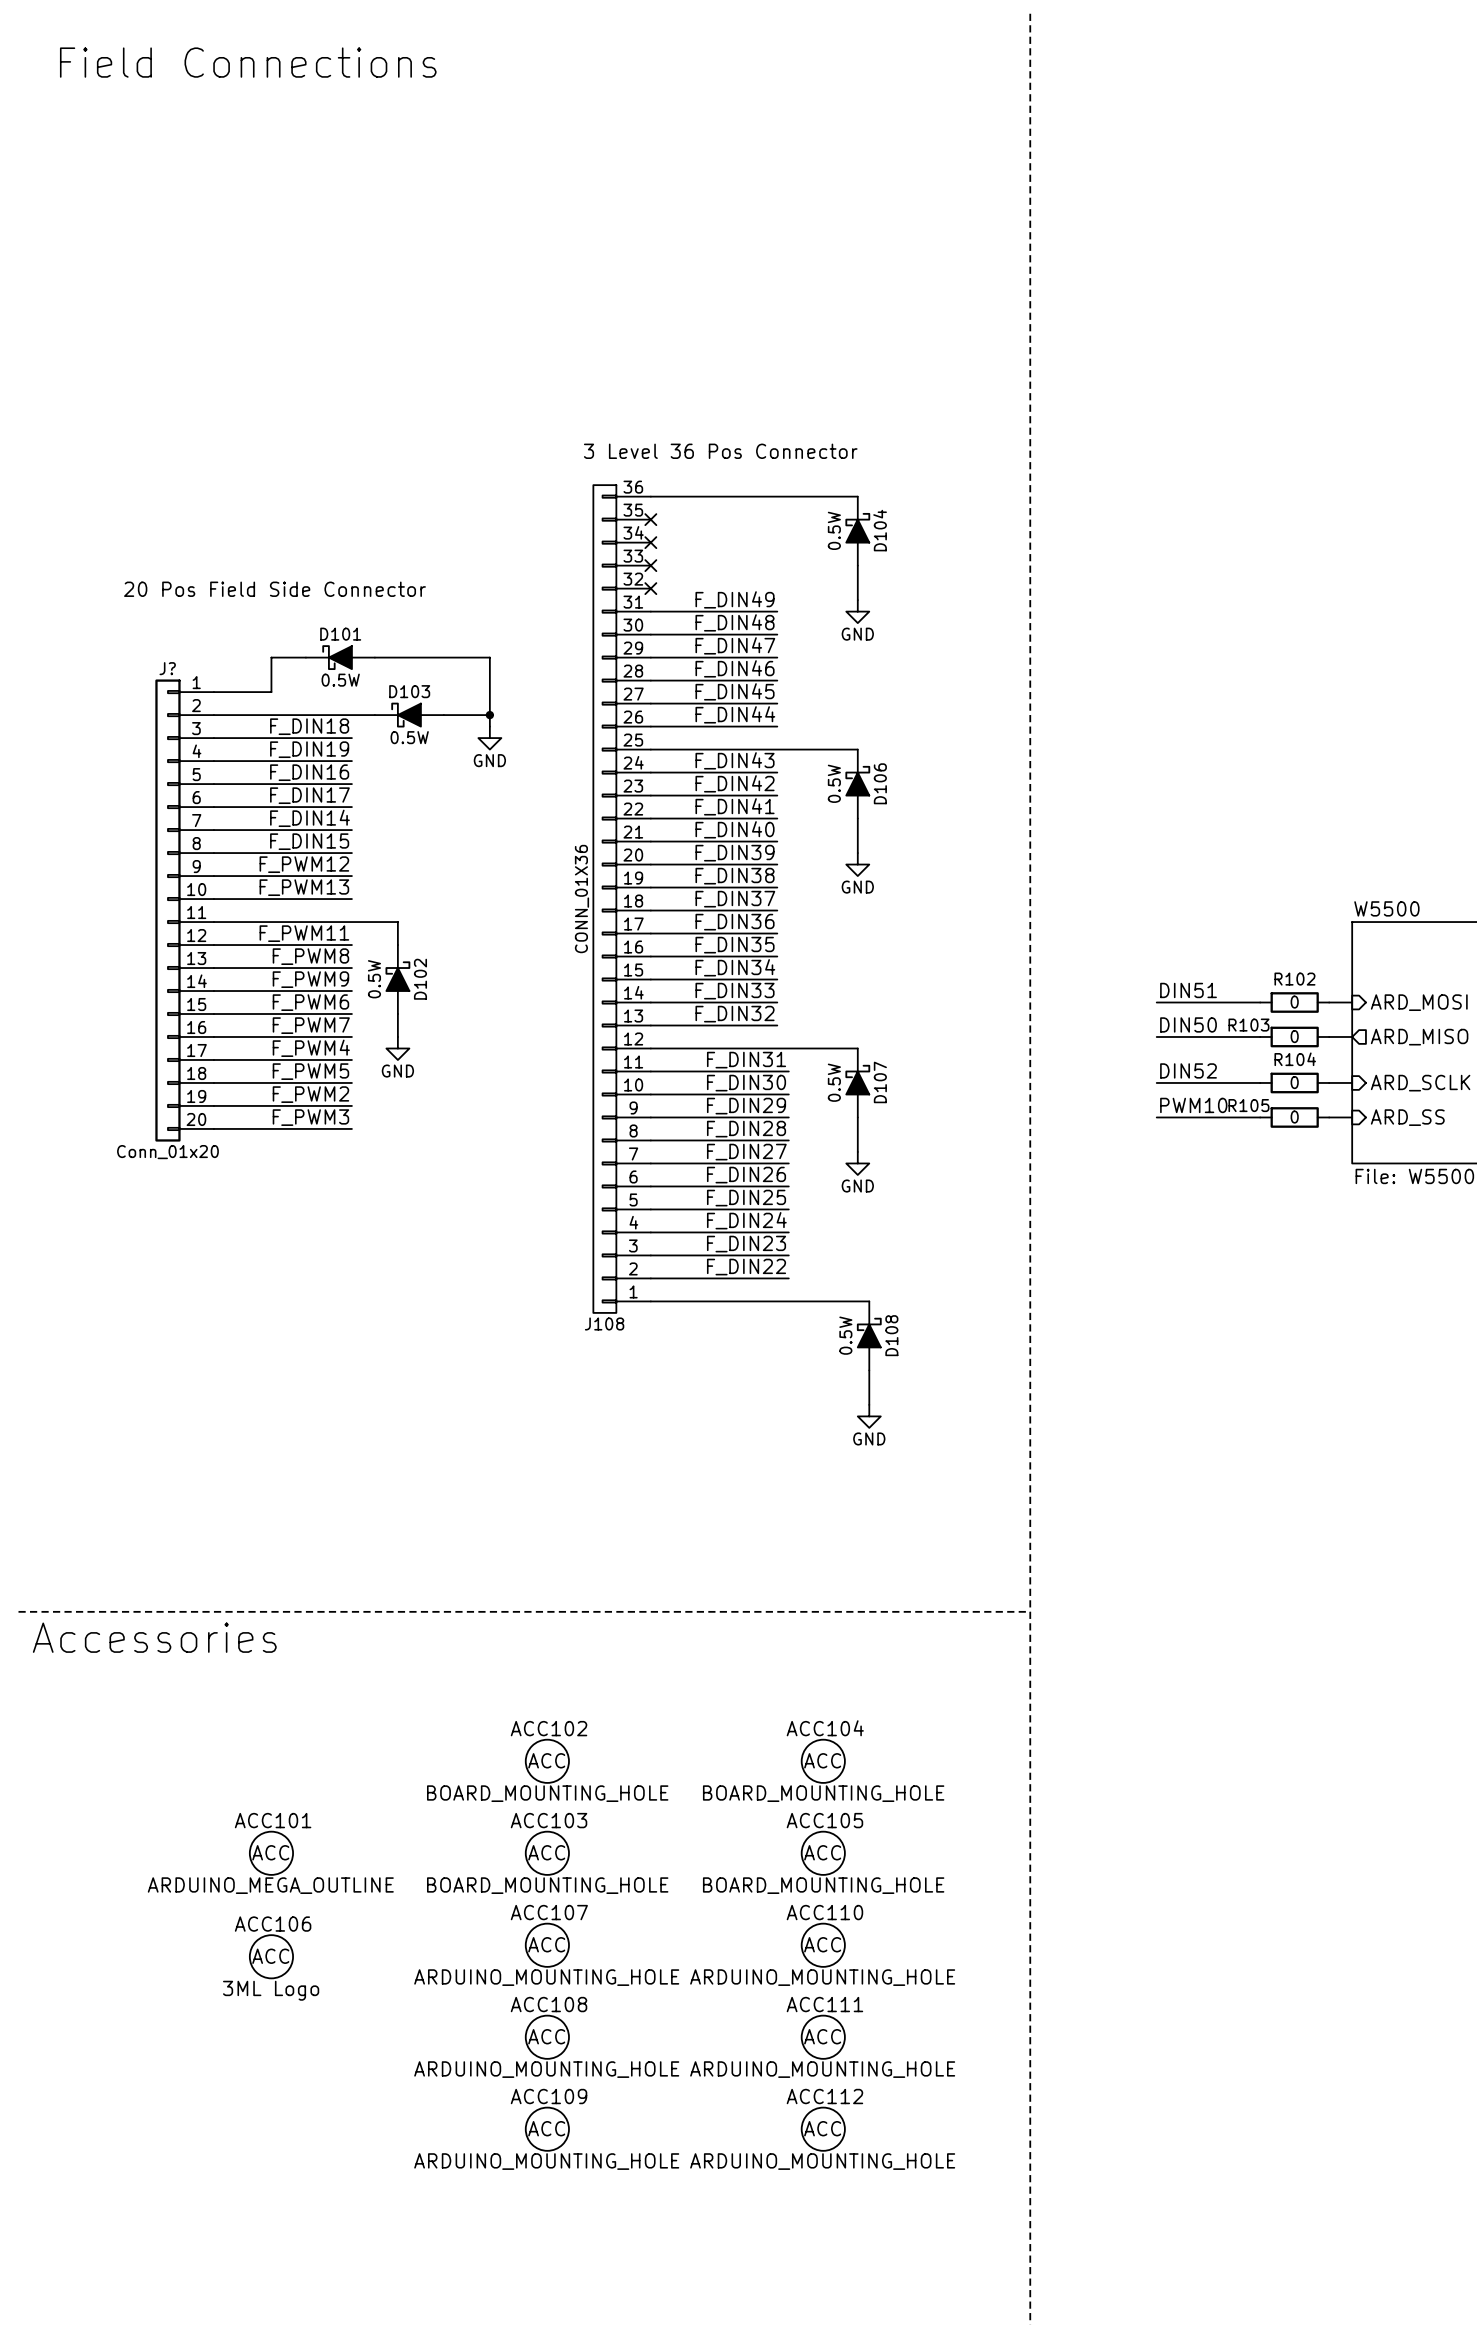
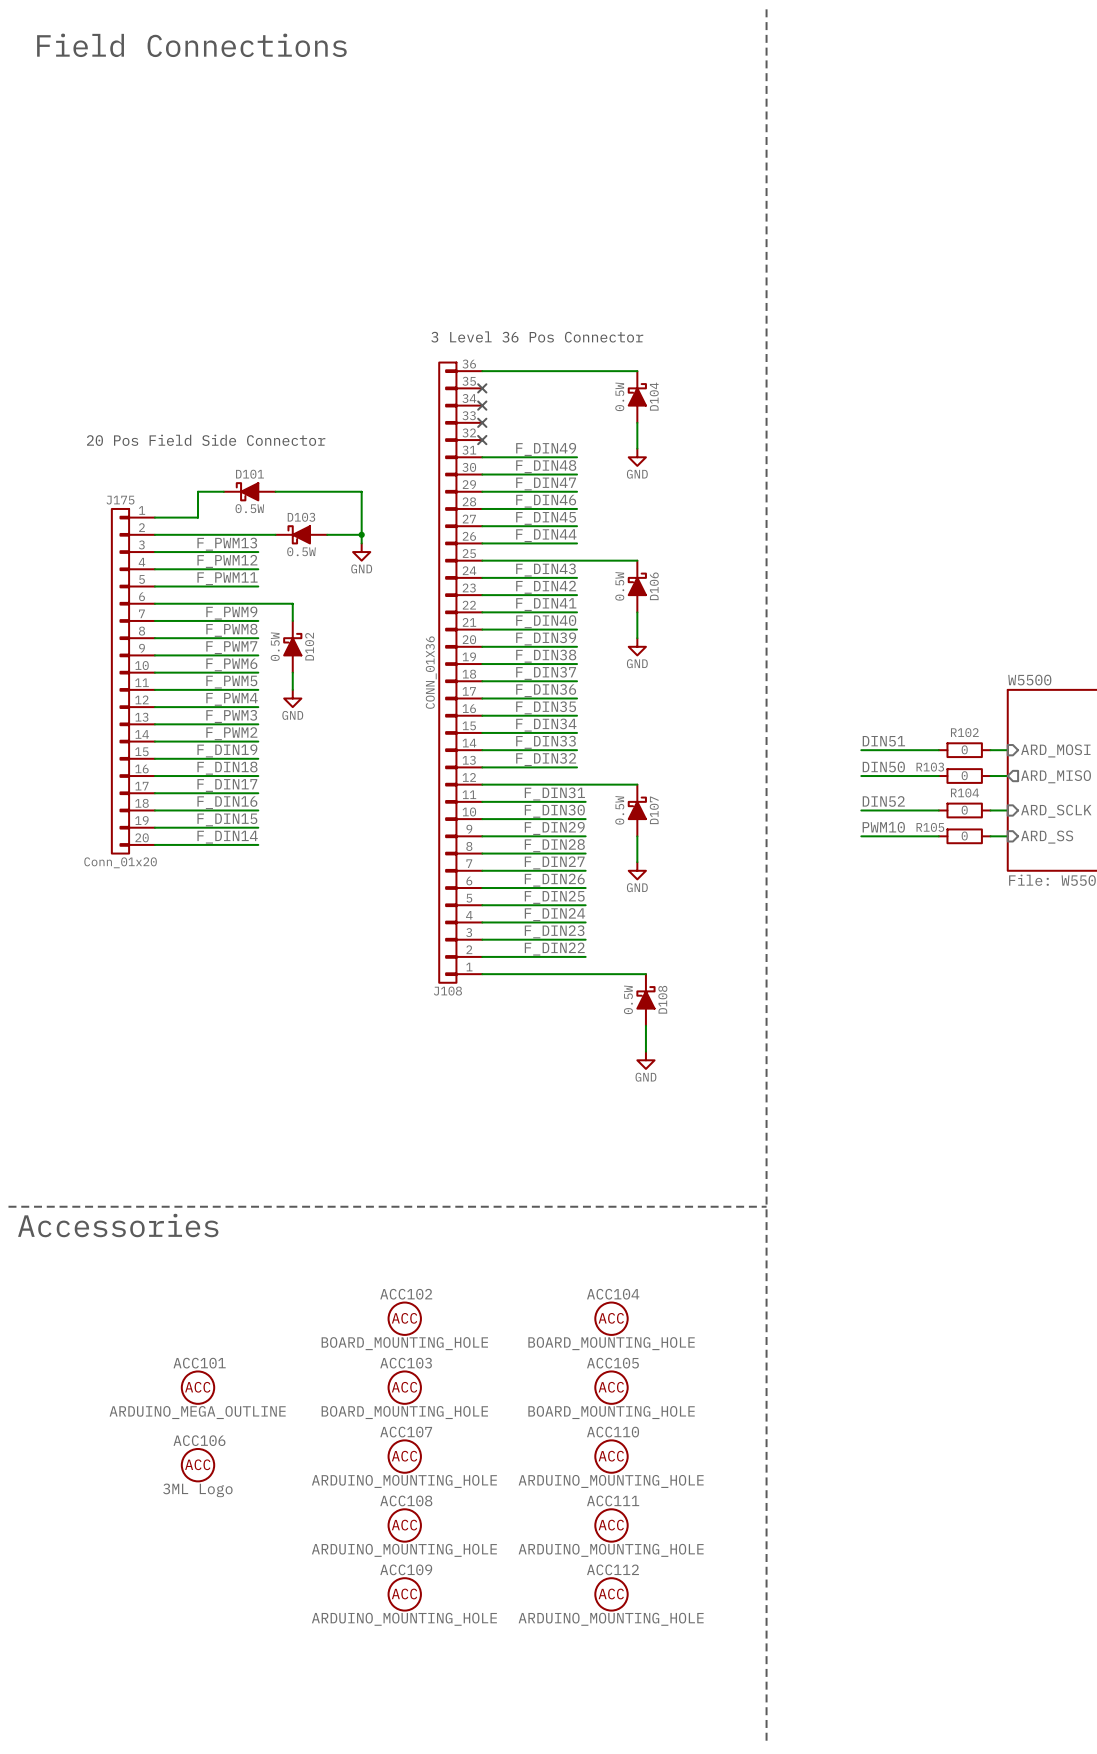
J? name: J? (167, 668) -> J175 (120, 500)
label: F_DIN18 (309, 726) -> F_PWM13 (227, 544)
label: F_DIN19 (309, 749) -> F_PWM12 (227, 561)
label: F_DIN16 (309, 772) -> F_PWM11 (227, 578)
label: F_DIN17 (309, 795) -> none
label: F_DIN14 (309, 818) -> F_PWM9 (231, 613)
label: F_DIN15 (309, 841) -> F_PWM8 (231, 630)
label: F_PWM12 (304, 864) -> F_PWM7 (231, 647)
label: F_PWM13 (304, 887) -> F_PWM6 (231, 664)
label: none -> F_PWM5 (231, 682)
wire: (351, 922) (397, 922) (397, 945) -> (258, 603) (292, 603) (292, 620)
label: F_PWM11 (304, 933) -> F_PWM4 (232, 699)
label: F_PWM8 (310, 956) -> F_PWM3 (231, 716)
label: F_PWM9 (310, 979) -> F_PWM2 (231, 733)
D102 position: (397, 979) -> (292, 646)
label: F_PWM6 (310, 1002) -> F_DIN19 (227, 750)
wire: (397, 1014) (397, 1036) -> (292, 672) (292, 689)
label: F_PWM7 (311, 1025) -> F_DIN18 (227, 768)
label: F_PWM4 (311, 1048) -> F_DIN17 (227, 785)
power symbol position: GND (397, 1048) -> GND (292, 698)
label: F_PWM5 (310, 1071) -> F_DIN16 (227, 802)
label: F_PWM2 (310, 1094) -> F_DIN15 (227, 819)
label: F_PWM3 (310, 1117) -> F_DIN14 (227, 837)

